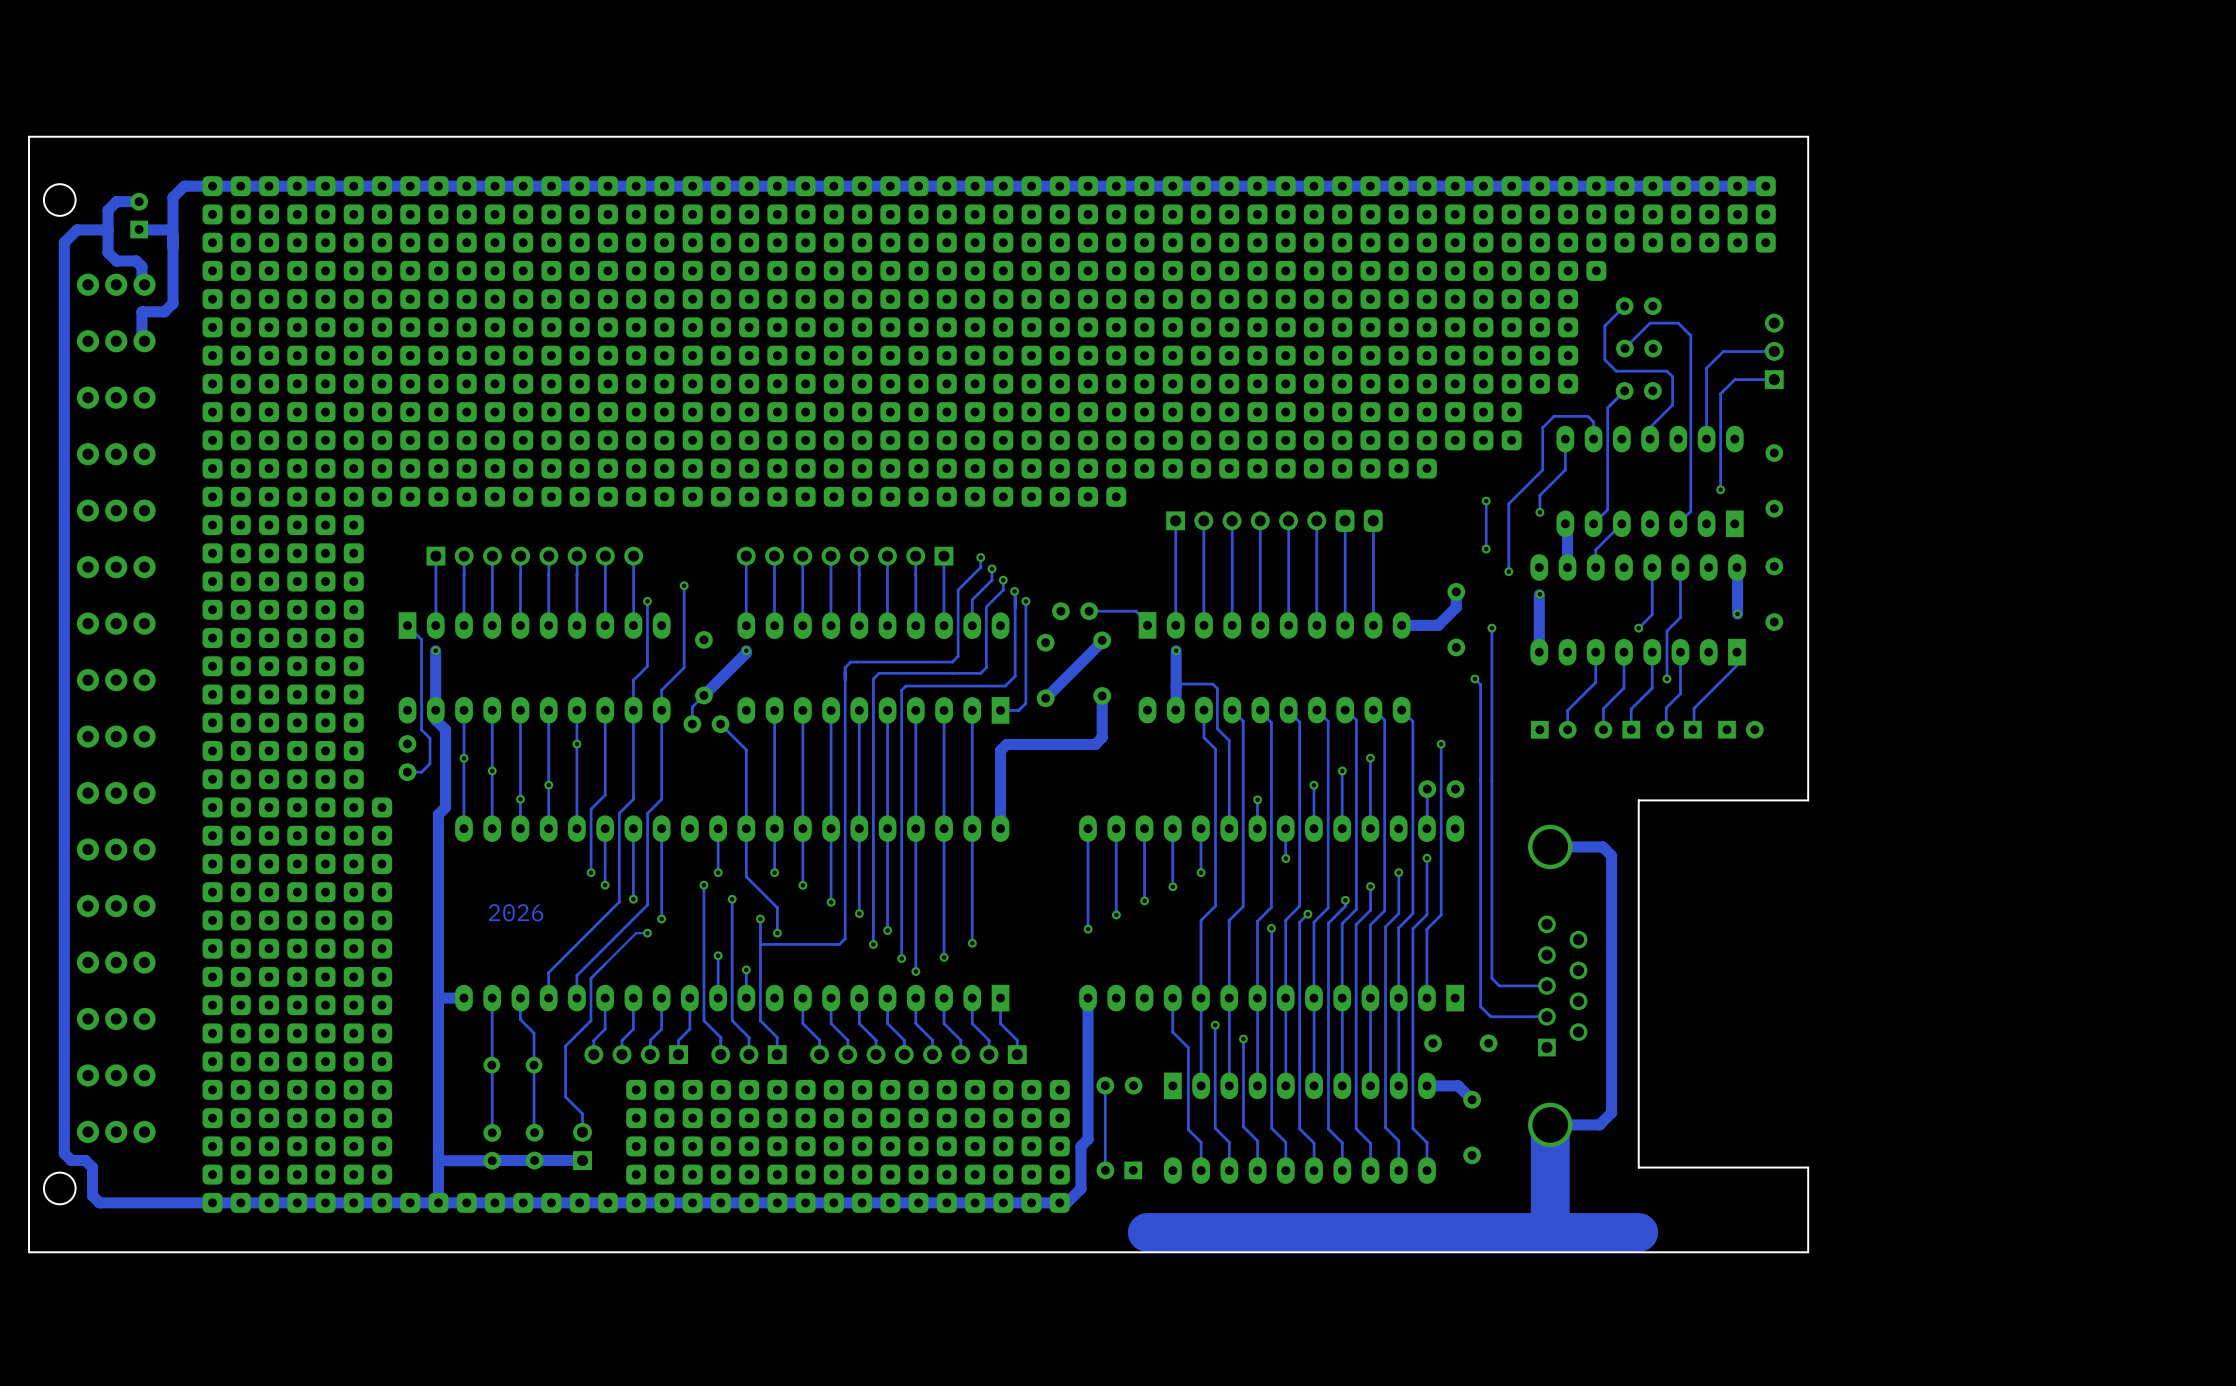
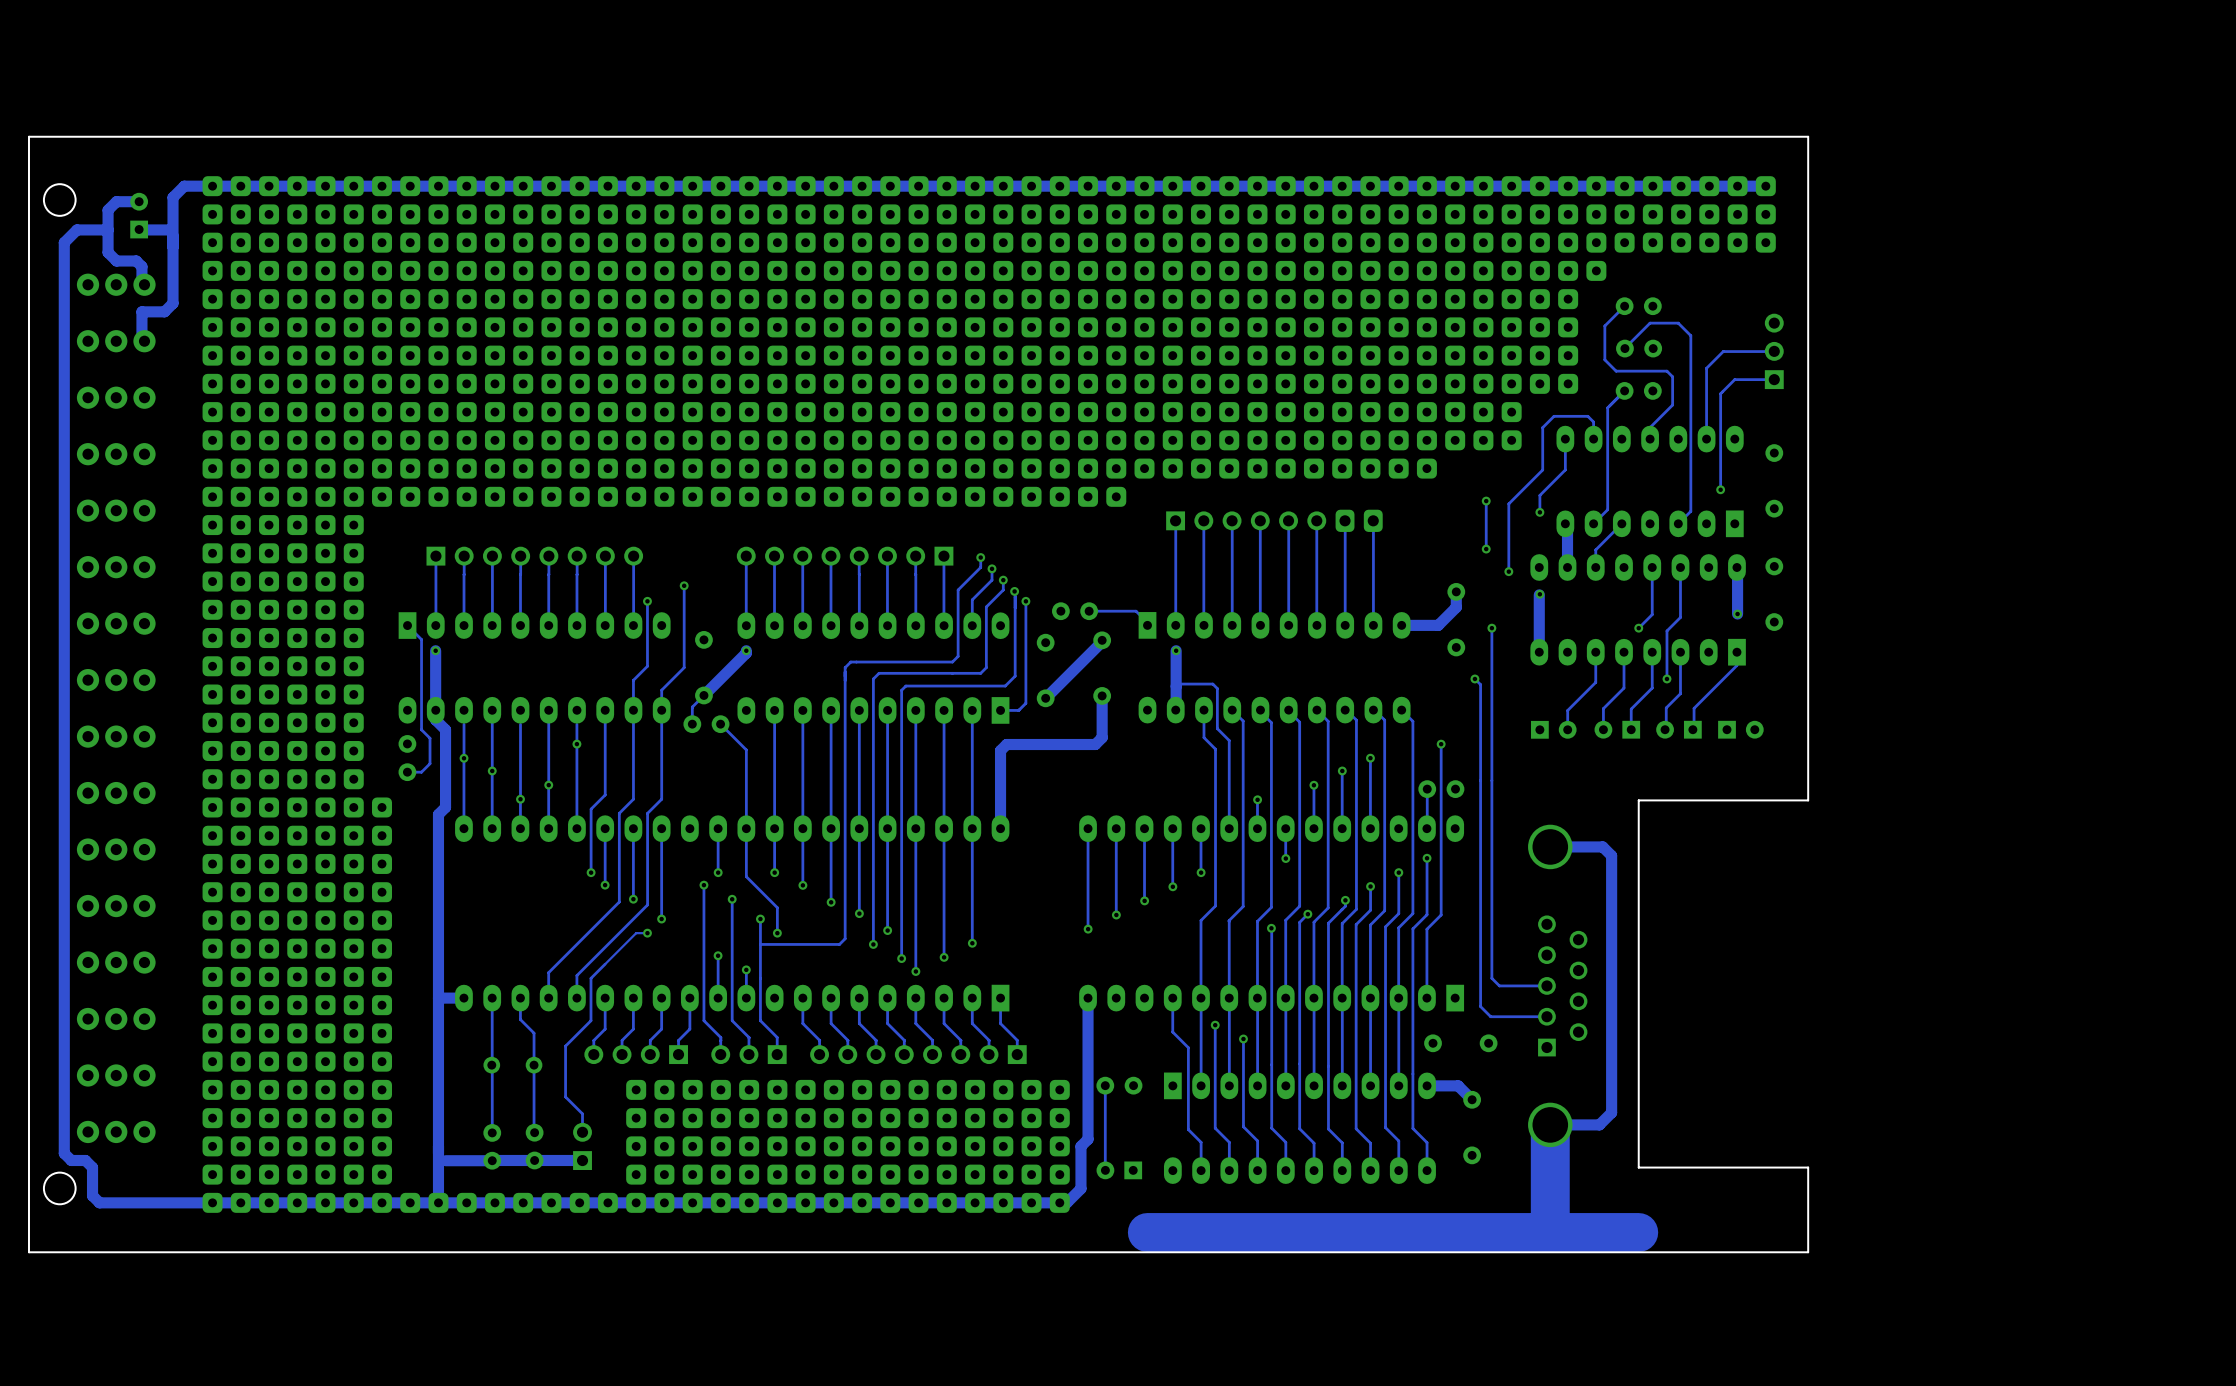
text: 2026 (516, 912) -> none

